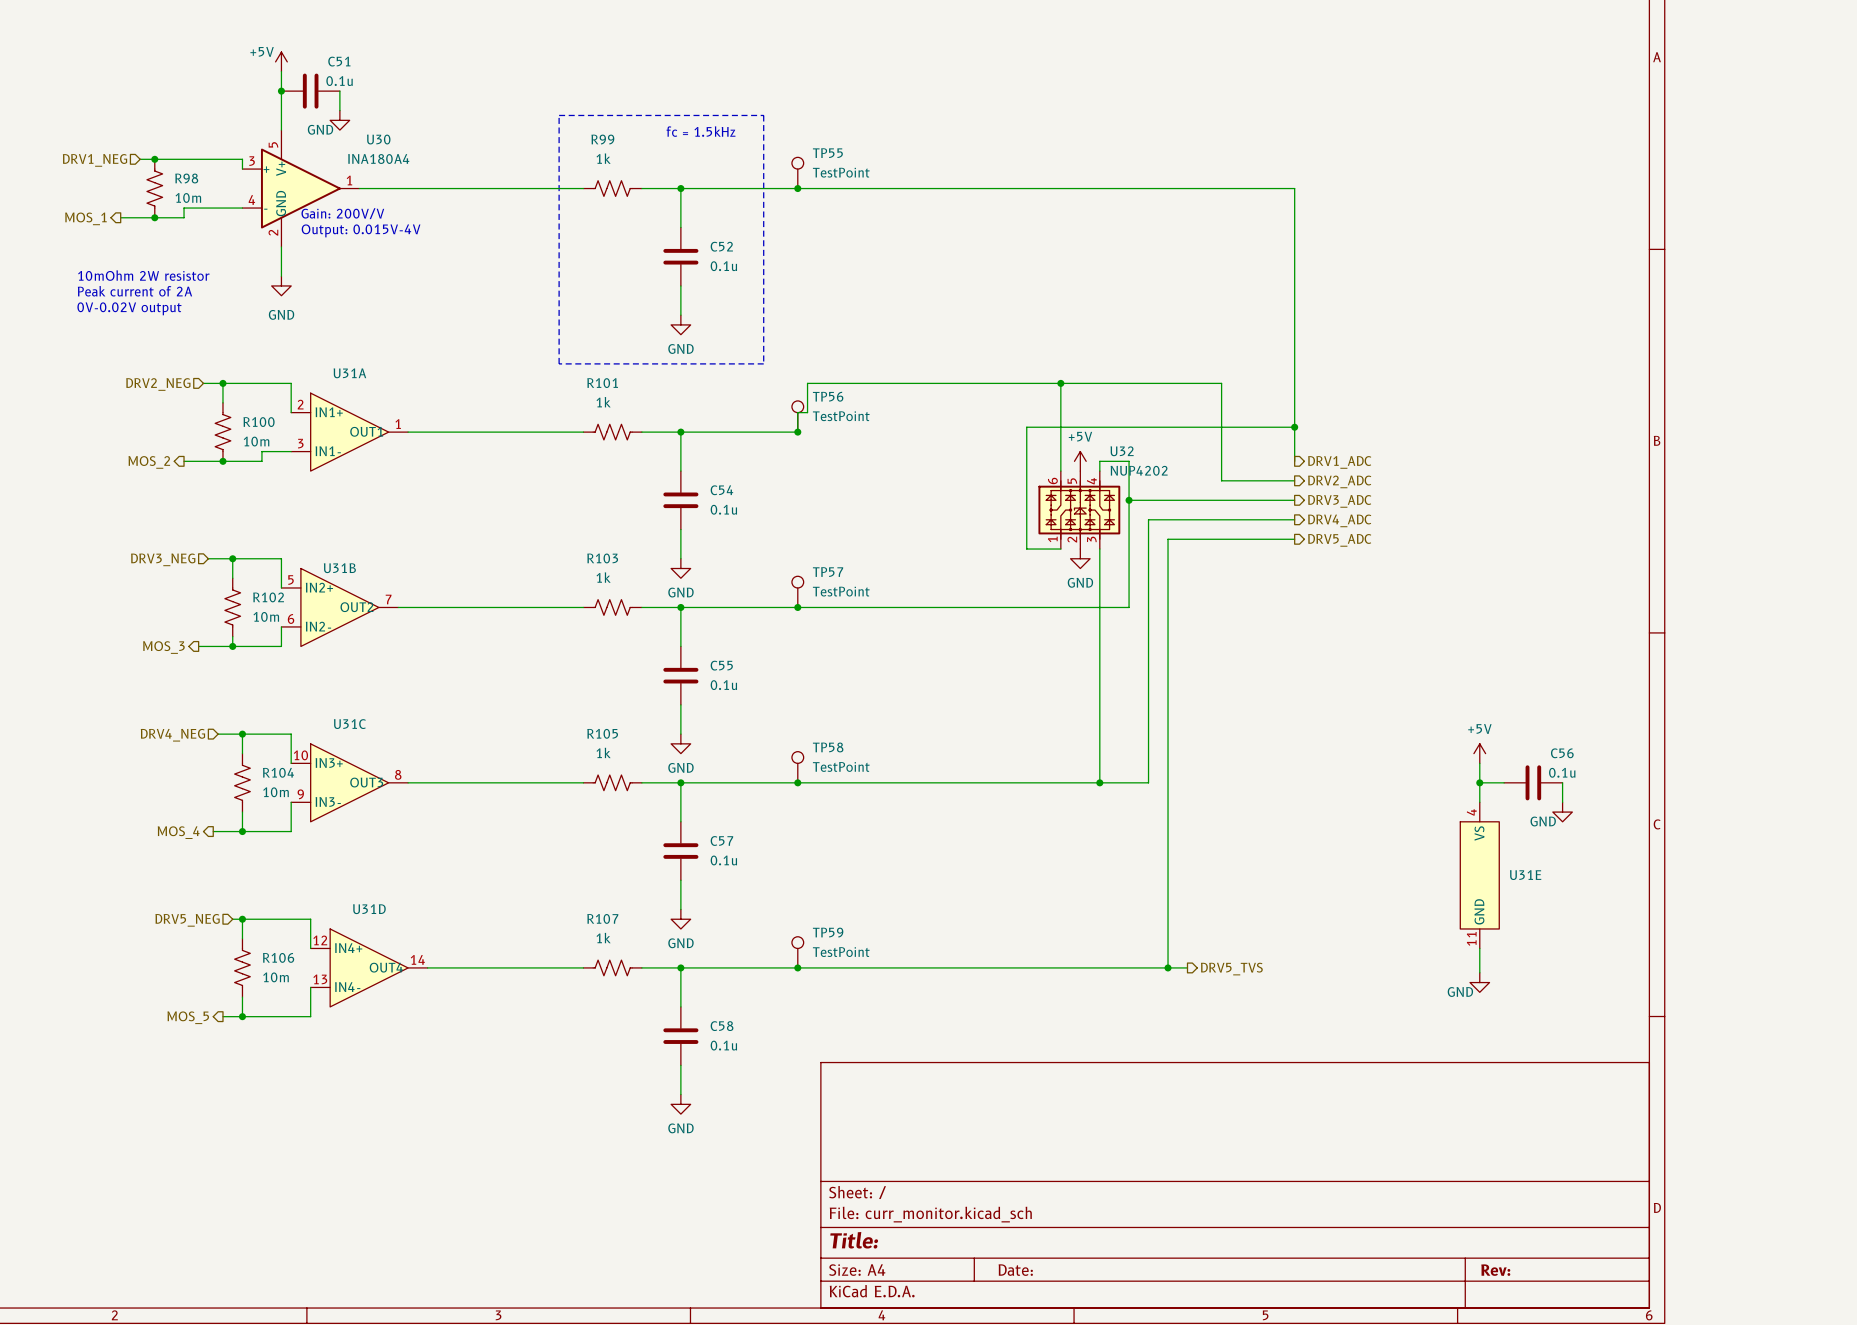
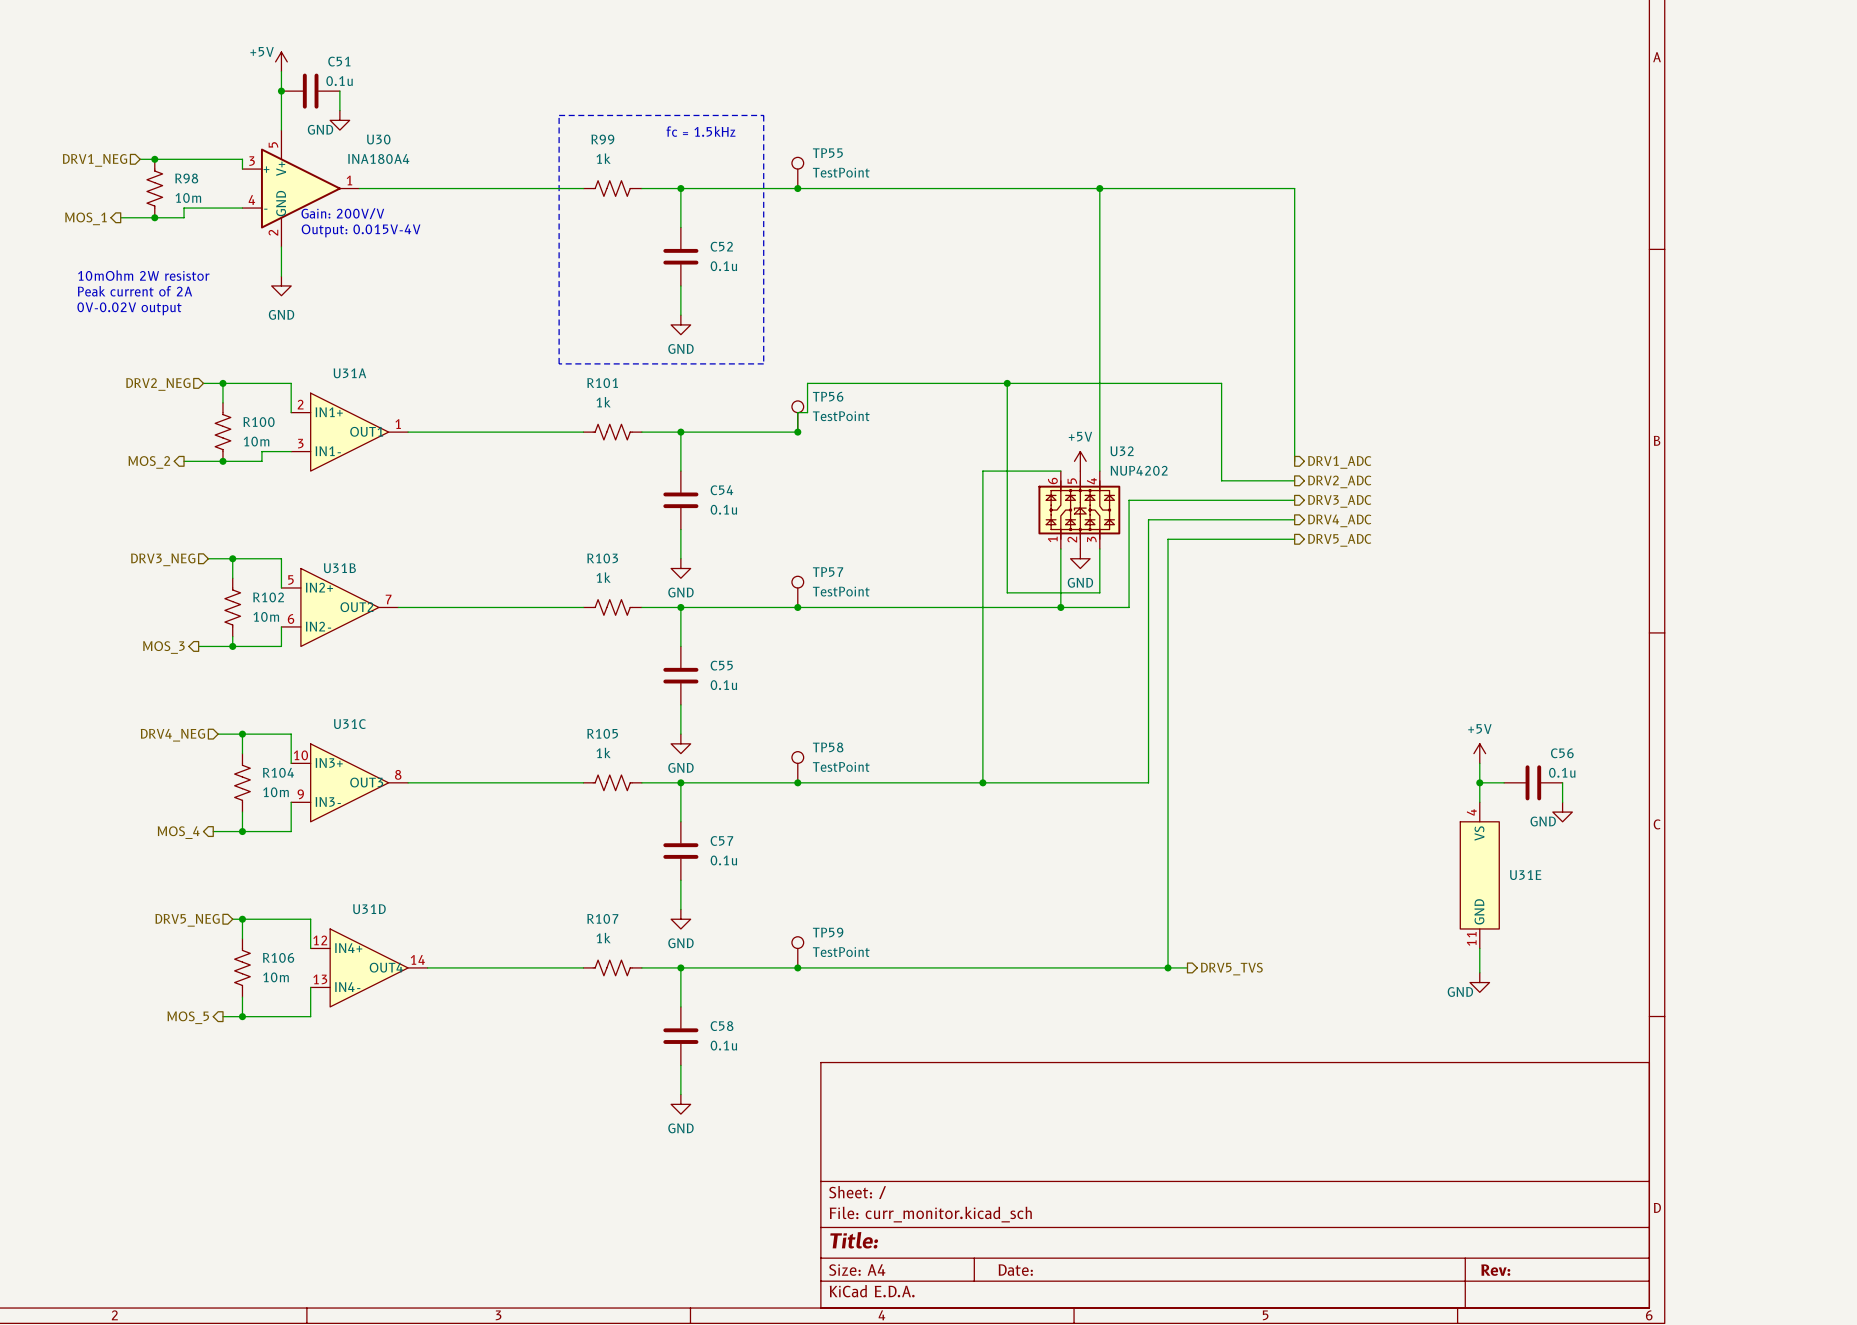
junction: none -> (1099, 188)
junction: none -> (1007, 383)
wire: (1060, 383) (1060, 471) -> (982, 782) (982, 471) (1060, 471)
junction: (1060, 383) -> none
wire: (1294, 427) (1026, 427) (1026, 549) (1060, 549) -> (1060, 607) (1060, 549)
junction: (1294, 427) -> none
wire: (1099, 461) (1129, 461) (1129, 500) -> (1099, 461) (1099, 188)
junction: (1129, 500) -> none
wire: (1099, 592) (1099, 782) -> (1099, 592) (1007, 592) (1007, 383)
junction: none -> (1060, 607)
junction: none -> (982, 782)
junction: (1099, 782) -> none

